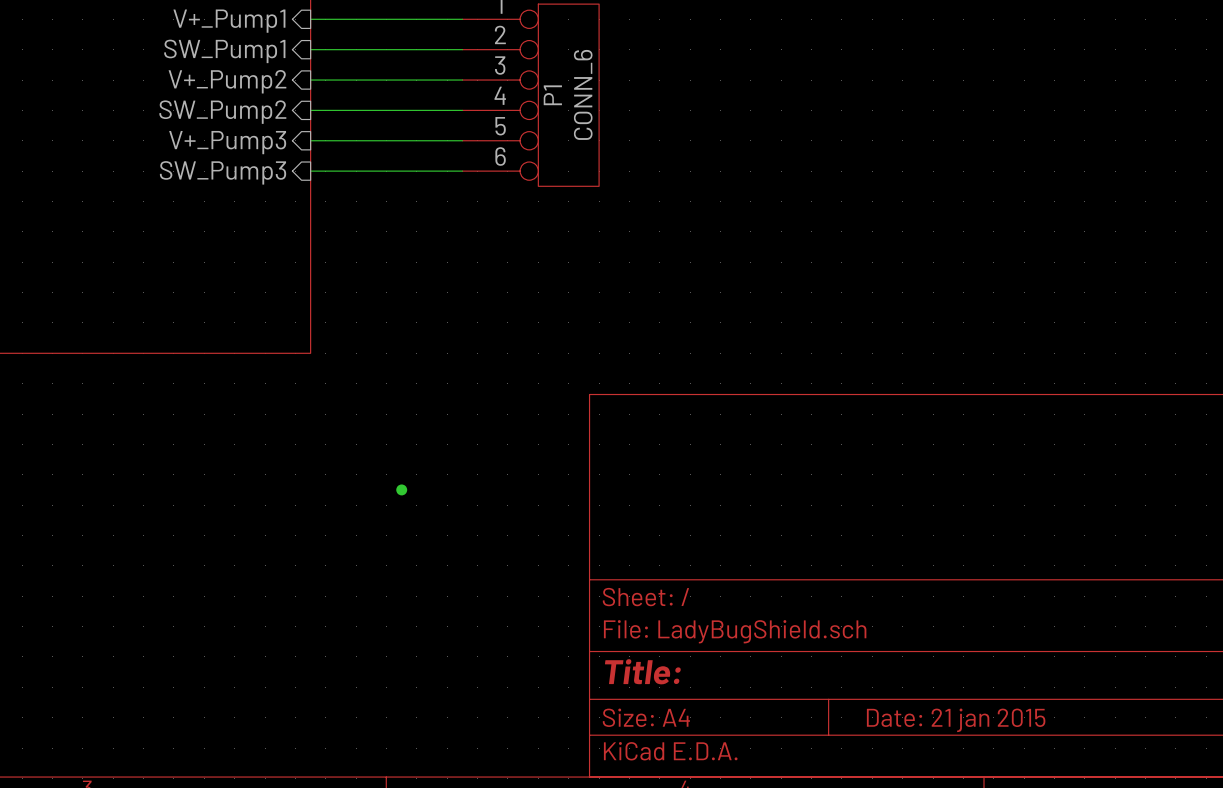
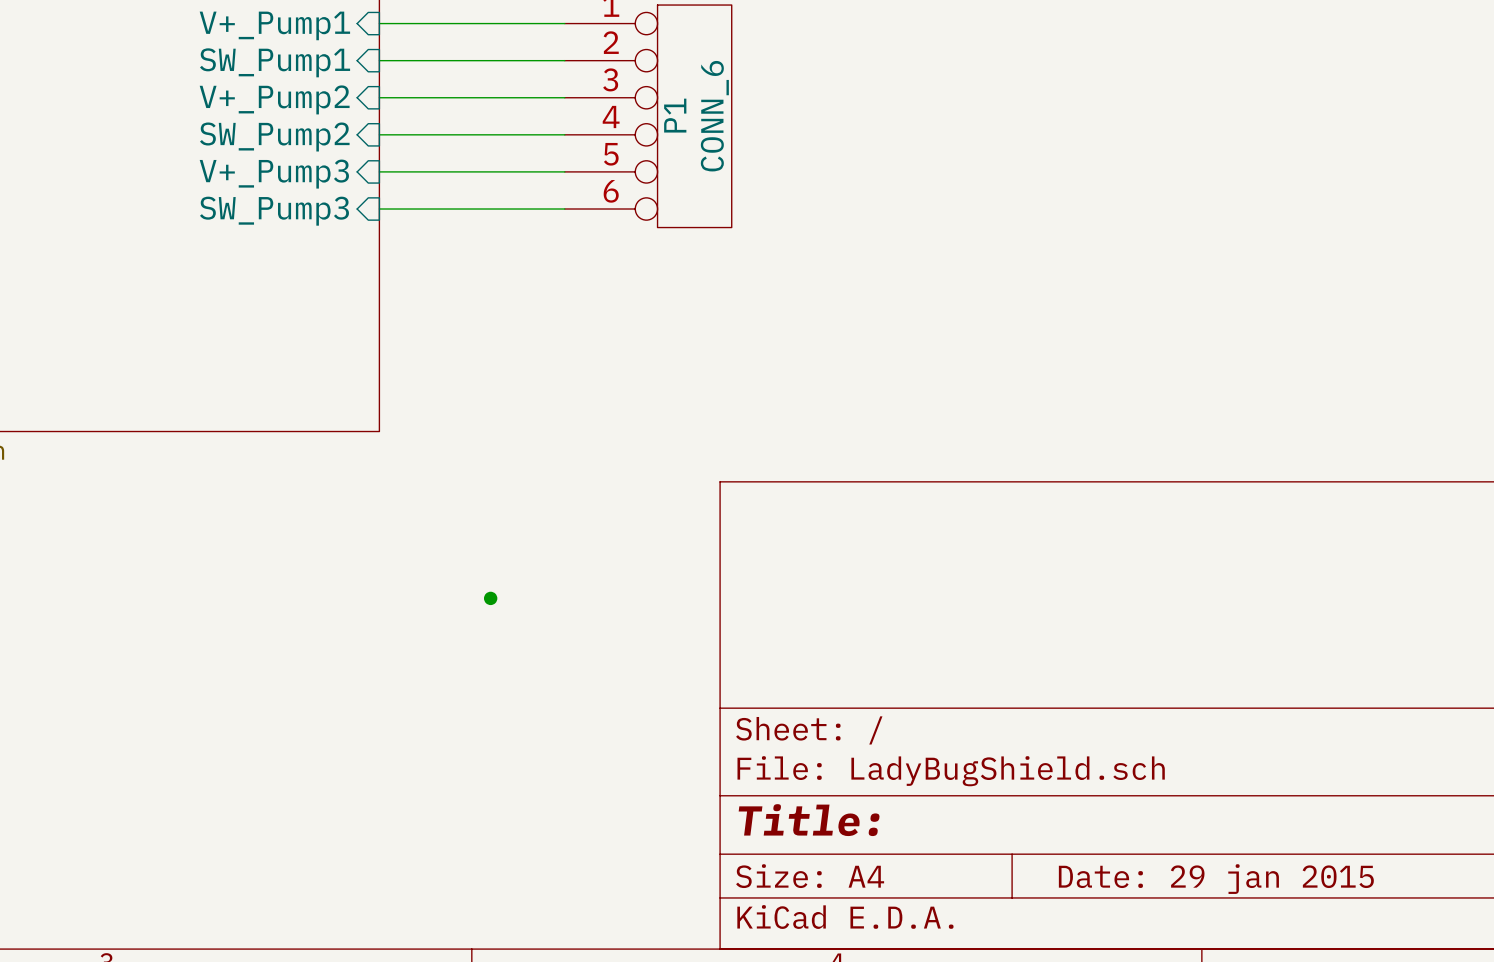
title block: Date: 21 jan 2015 (956, 720) -> Date: 29 jan 2015 (1216, 879)

